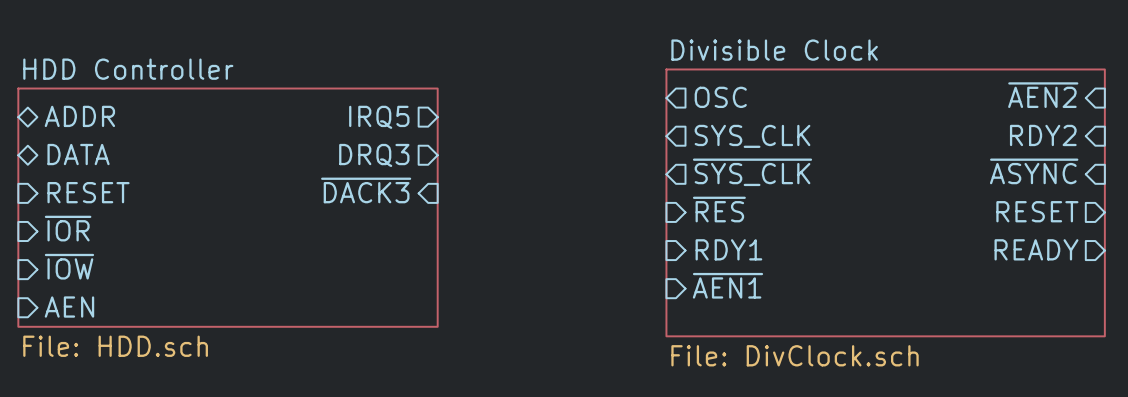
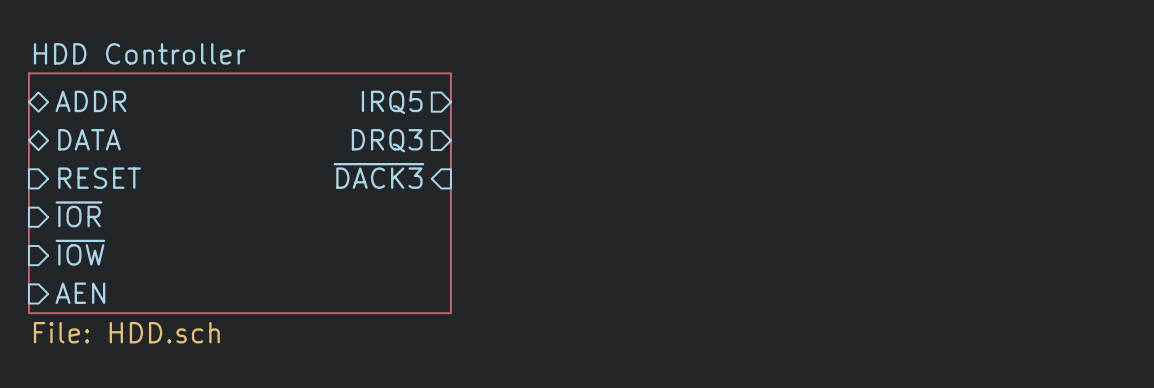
sheet pin: ~{AEN2} (1043, 95) -> none
sheet pin: OSC (720, 97) -> none
sheet pin: RDY2 (1043, 135) -> none
sheet pin: SYS_CLK (752, 136) -> none
sheet pin: ~{ASYNC} (1034, 171) -> none
sheet pin: ~{SYS_CLK} (752, 172) -> none
sheet Divisible Clock: File: DivClock.sch (885, 202) -> none
sheet pin: ~{RES} (719, 209) -> none
sheet pin: RESET (1037, 211) -> none
sheet pin: RDY1 (728, 249) -> none
sheet pin: READY (1036, 249) -> none
sheet pin: ~{AEN1} (727, 285) -> none

